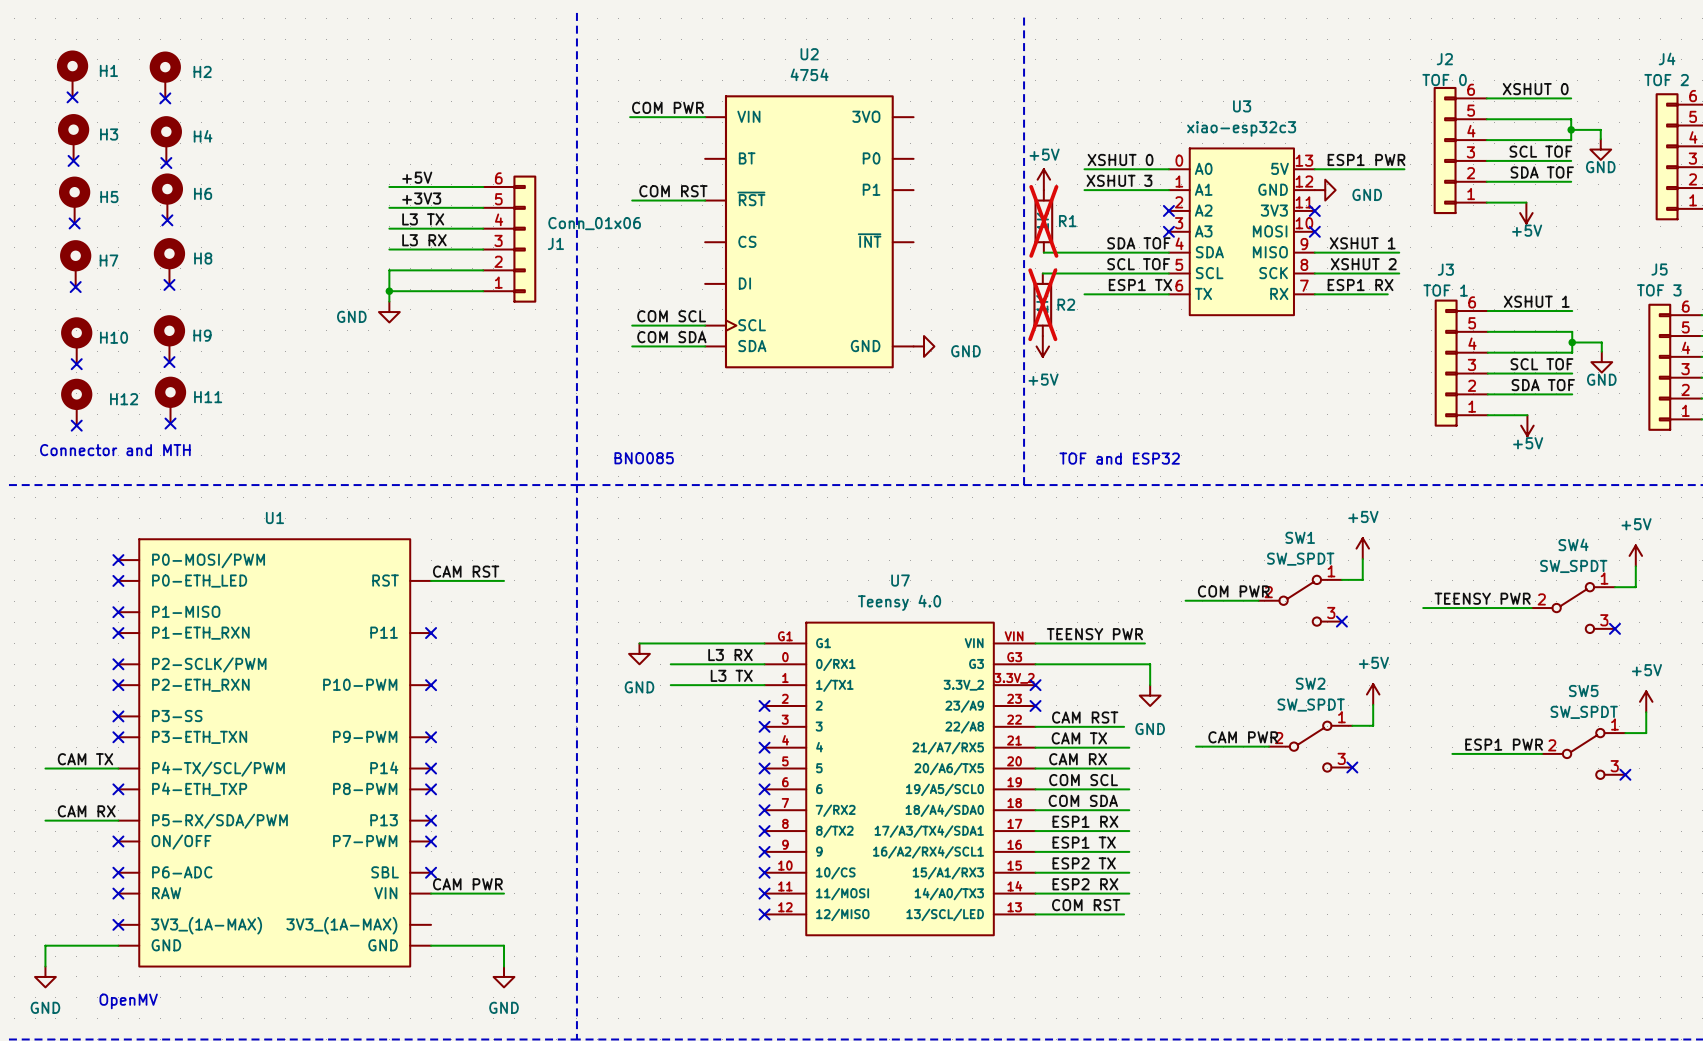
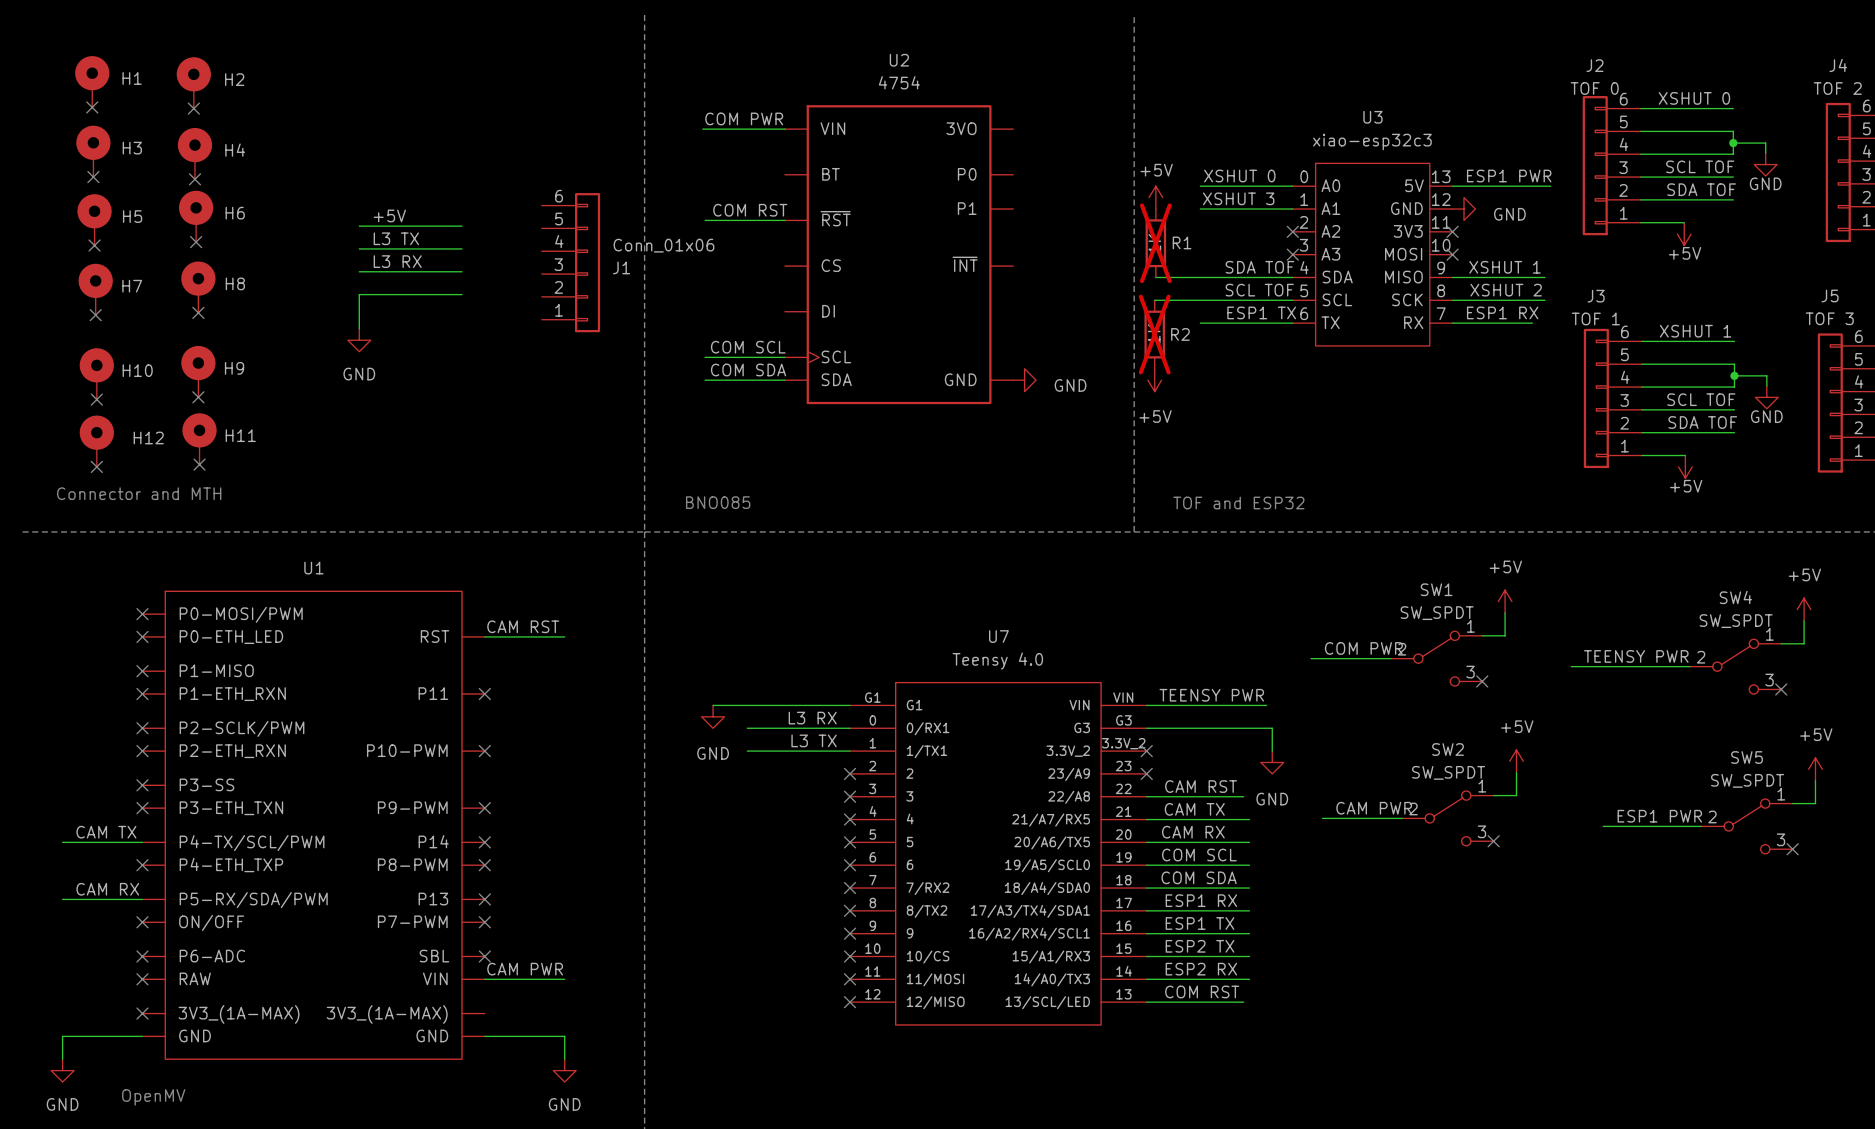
label position: +5V (417, 177) -> +5V (389, 215)
wire: (389, 186) (483, 186) -> none
label: +3V3 (421, 198) -> none
wire: (389, 207) (483, 207) -> (359, 226) (462, 226)
label position: L3 TX (423, 219) -> L3 TX (396, 238)
wire: (389, 228) (483, 228) -> (359, 248) (462, 248)
label position: L3 RX (424, 240) -> L3 RX (397, 261)
wire: (389, 249) (483, 249) -> (359, 271) (462, 271)
wire: (483, 270) (389, 270) (389, 301) -> (462, 294) (359, 294) (359, 328)
wire: (389, 291) (483, 291) -> none
junction: (389, 291) -> none
power symbol position: GND (389, 312) -> GND (359, 340)
power symbol text position: GND (351, 316) -> GND (359, 374)

